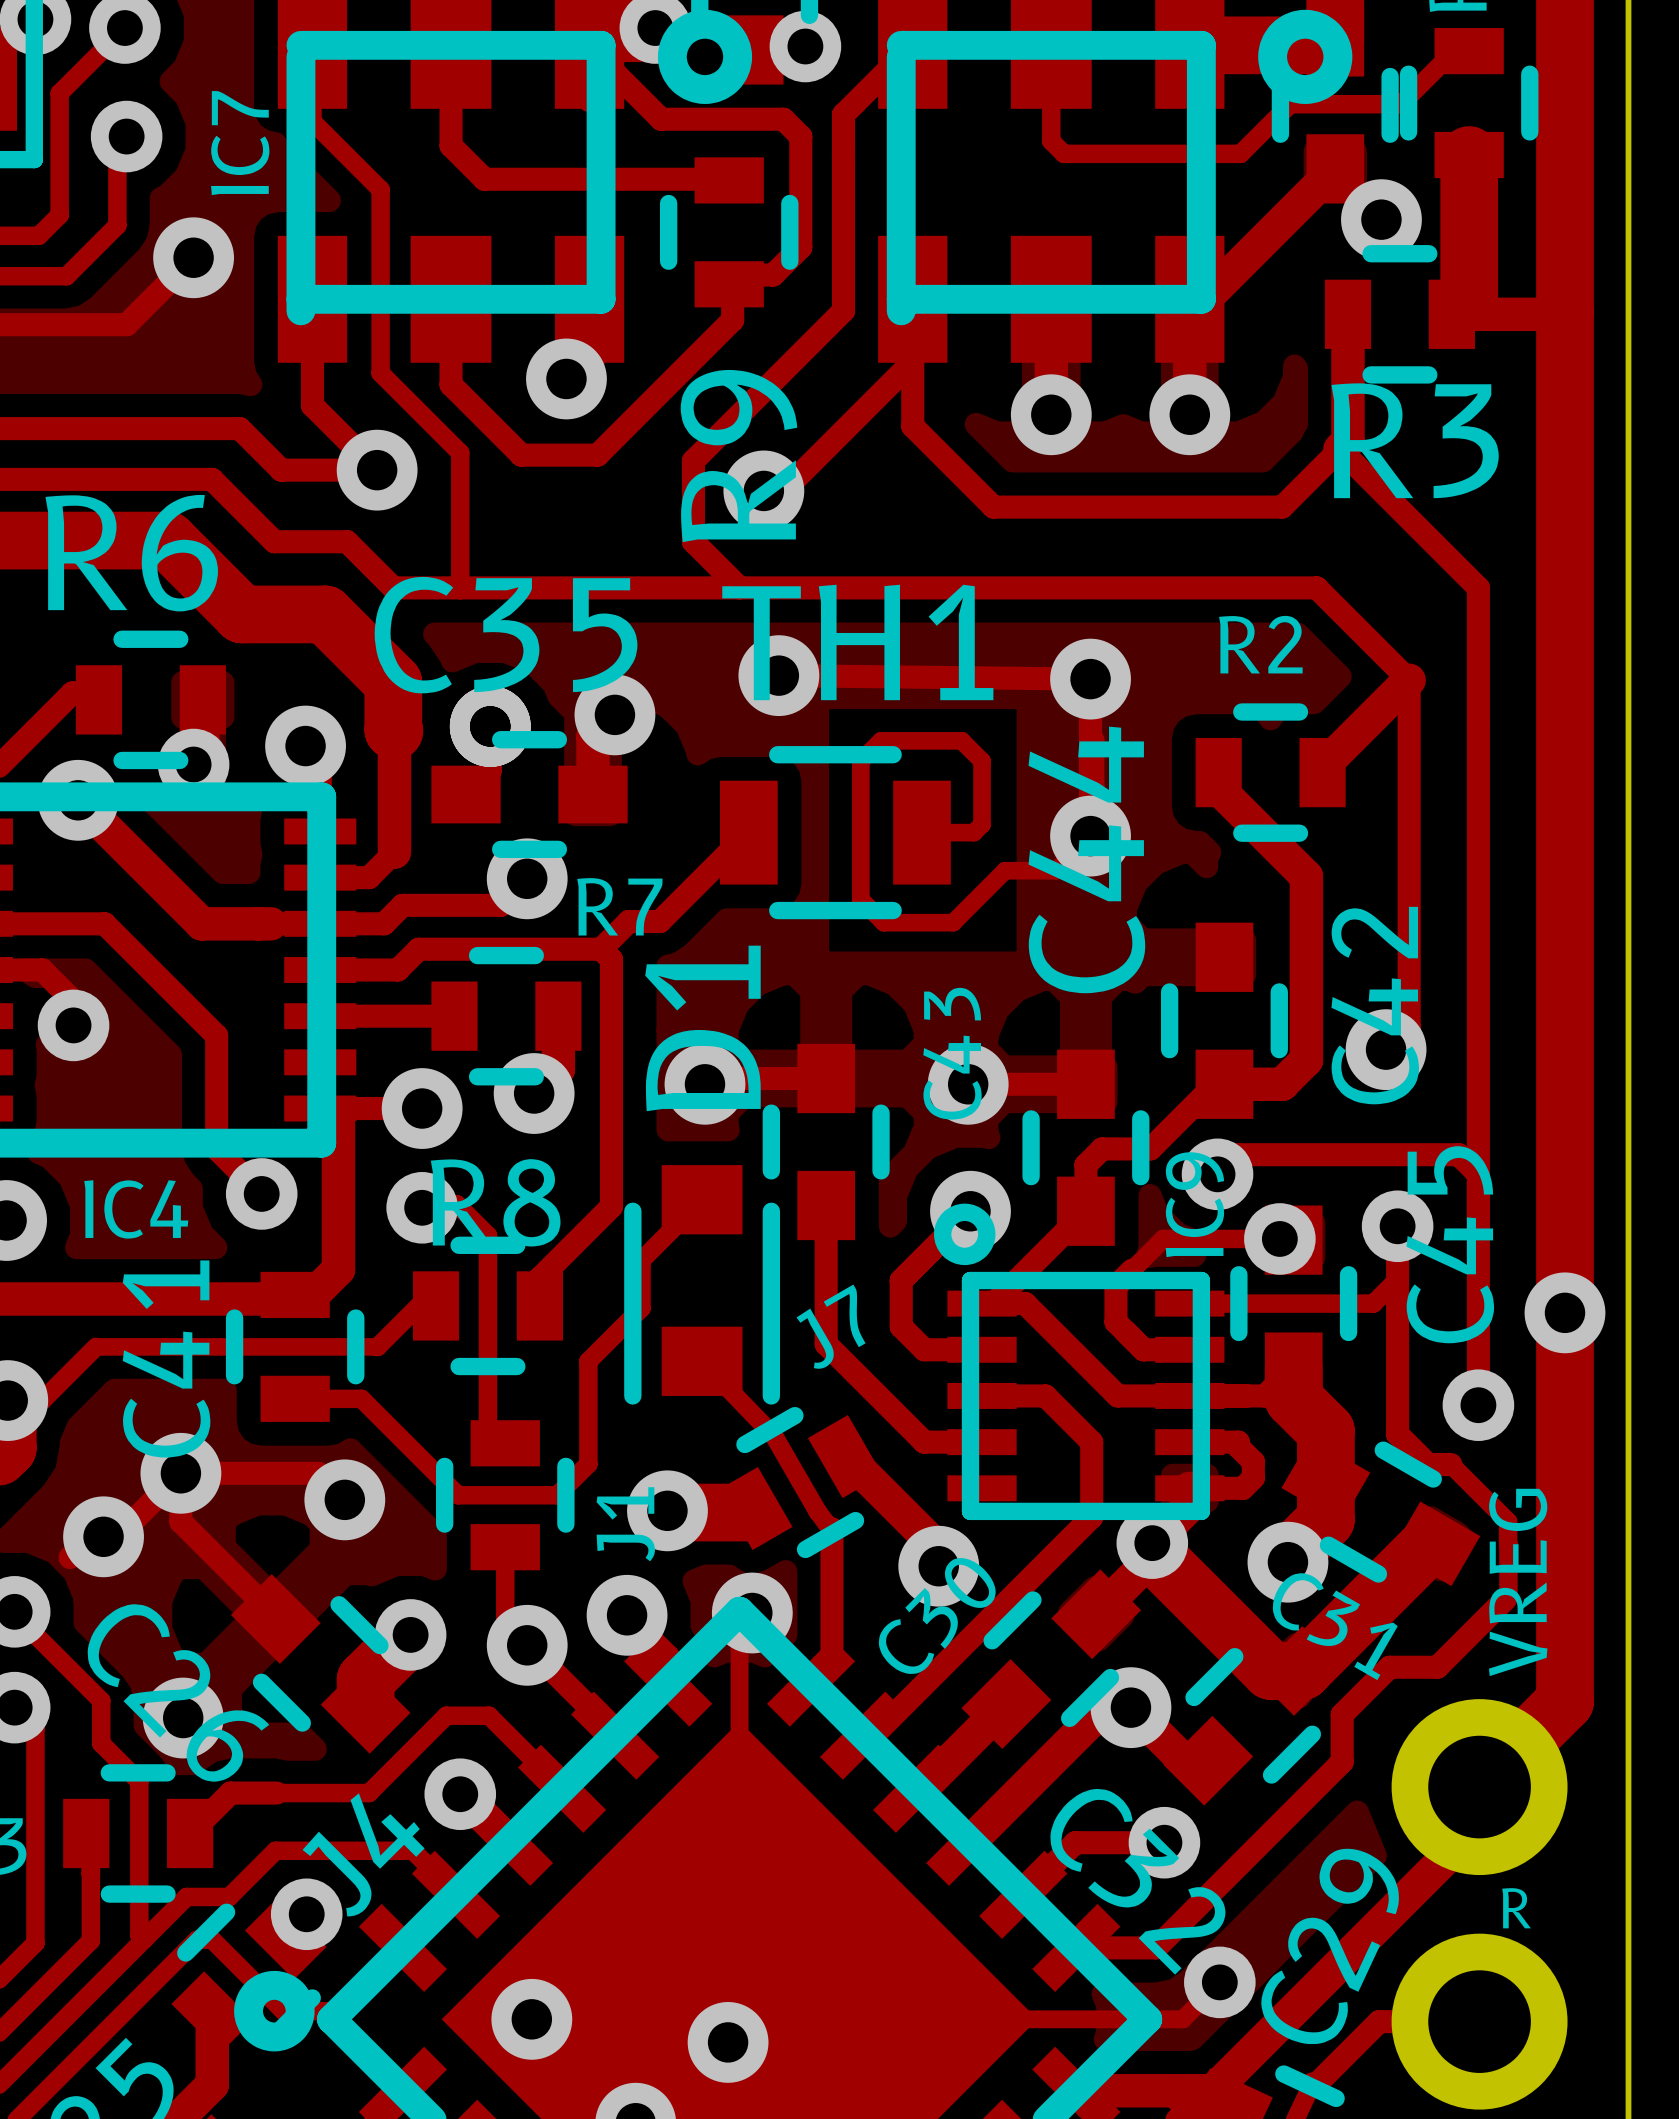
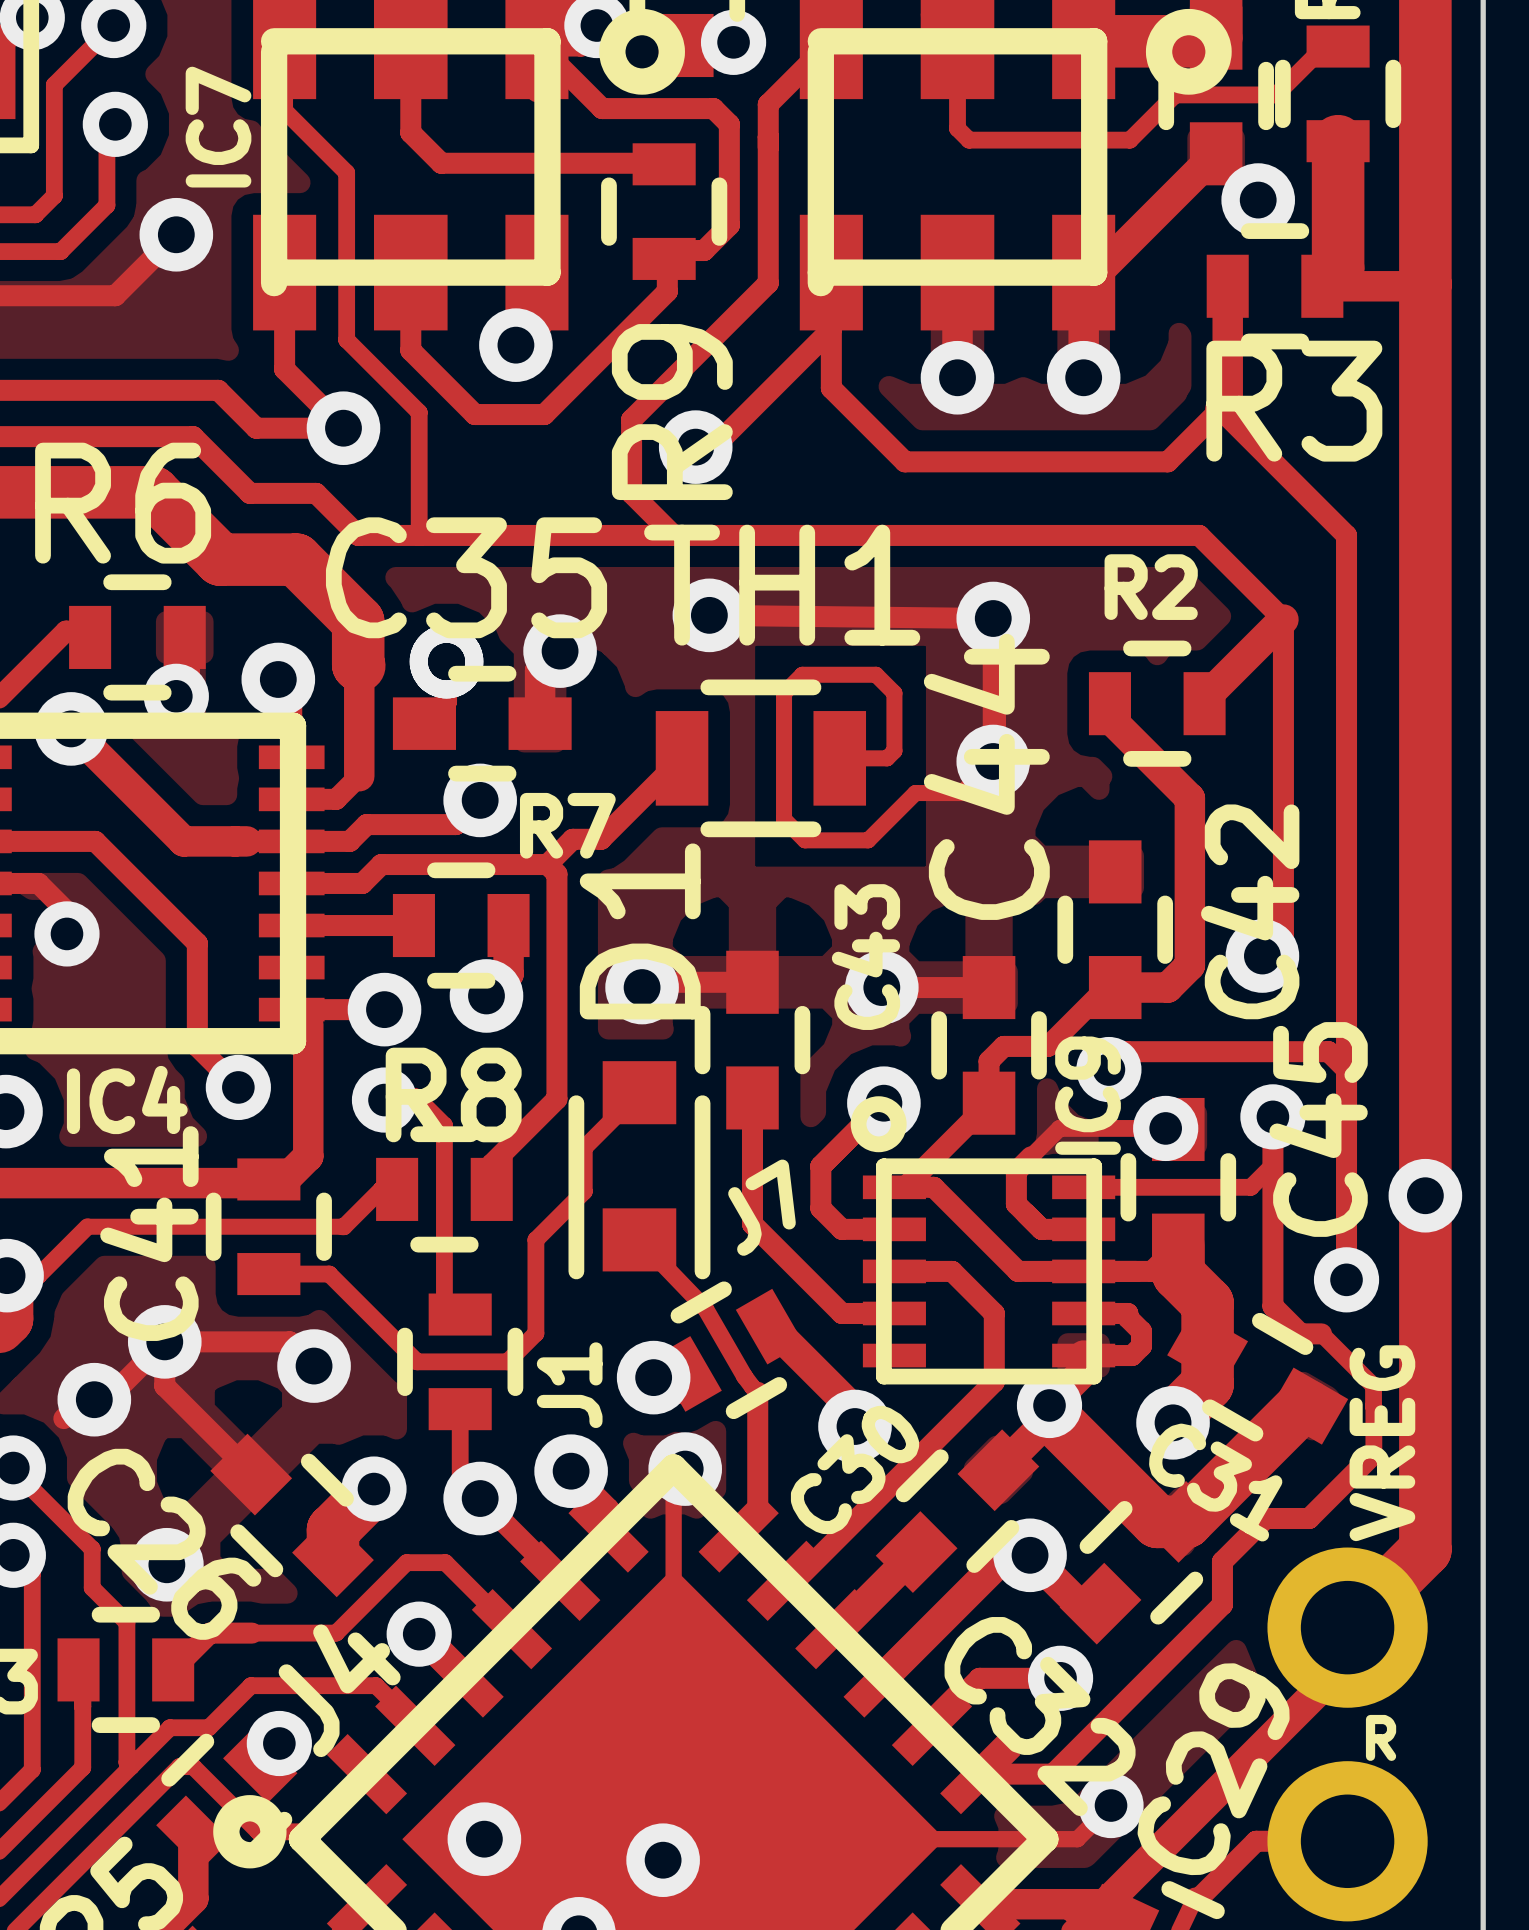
via position: (667, 1510) -> (653, 1377)

